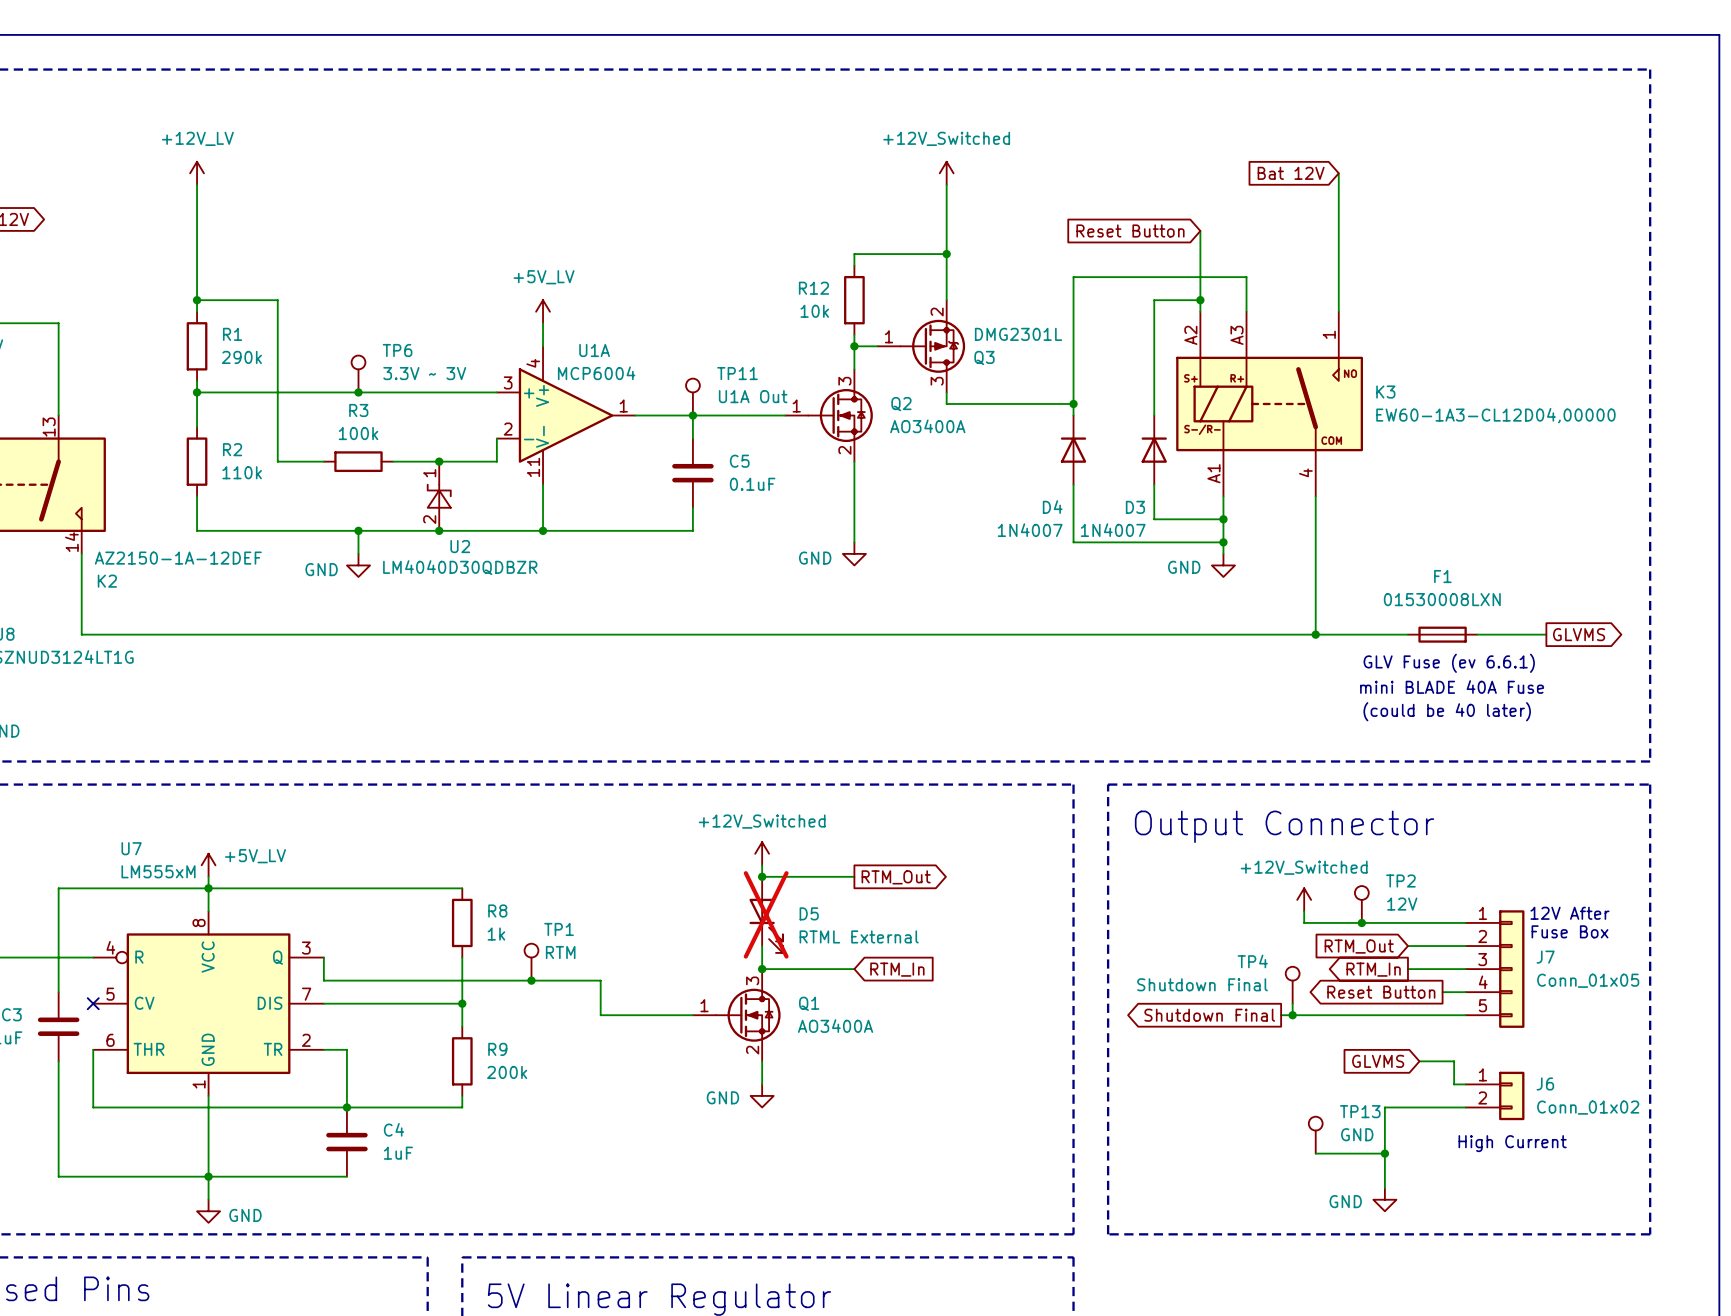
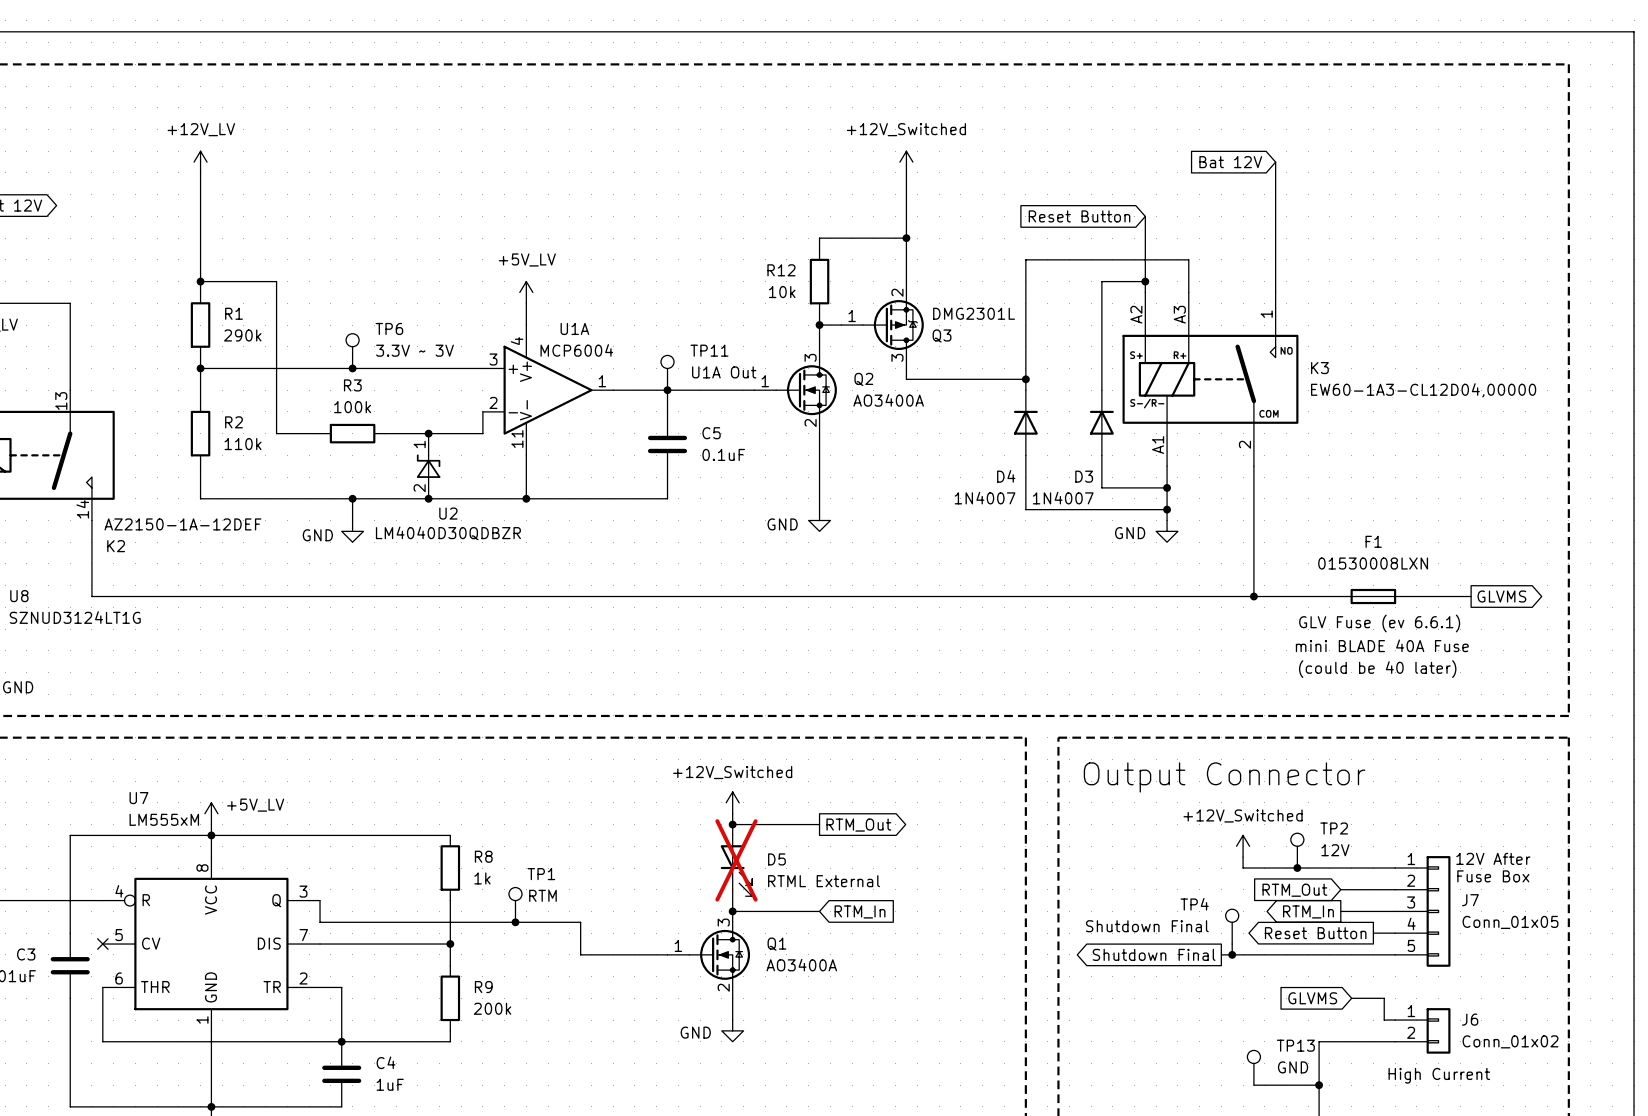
K3 pin number: 4 (1305, 472) -> 2 (1244, 444)

